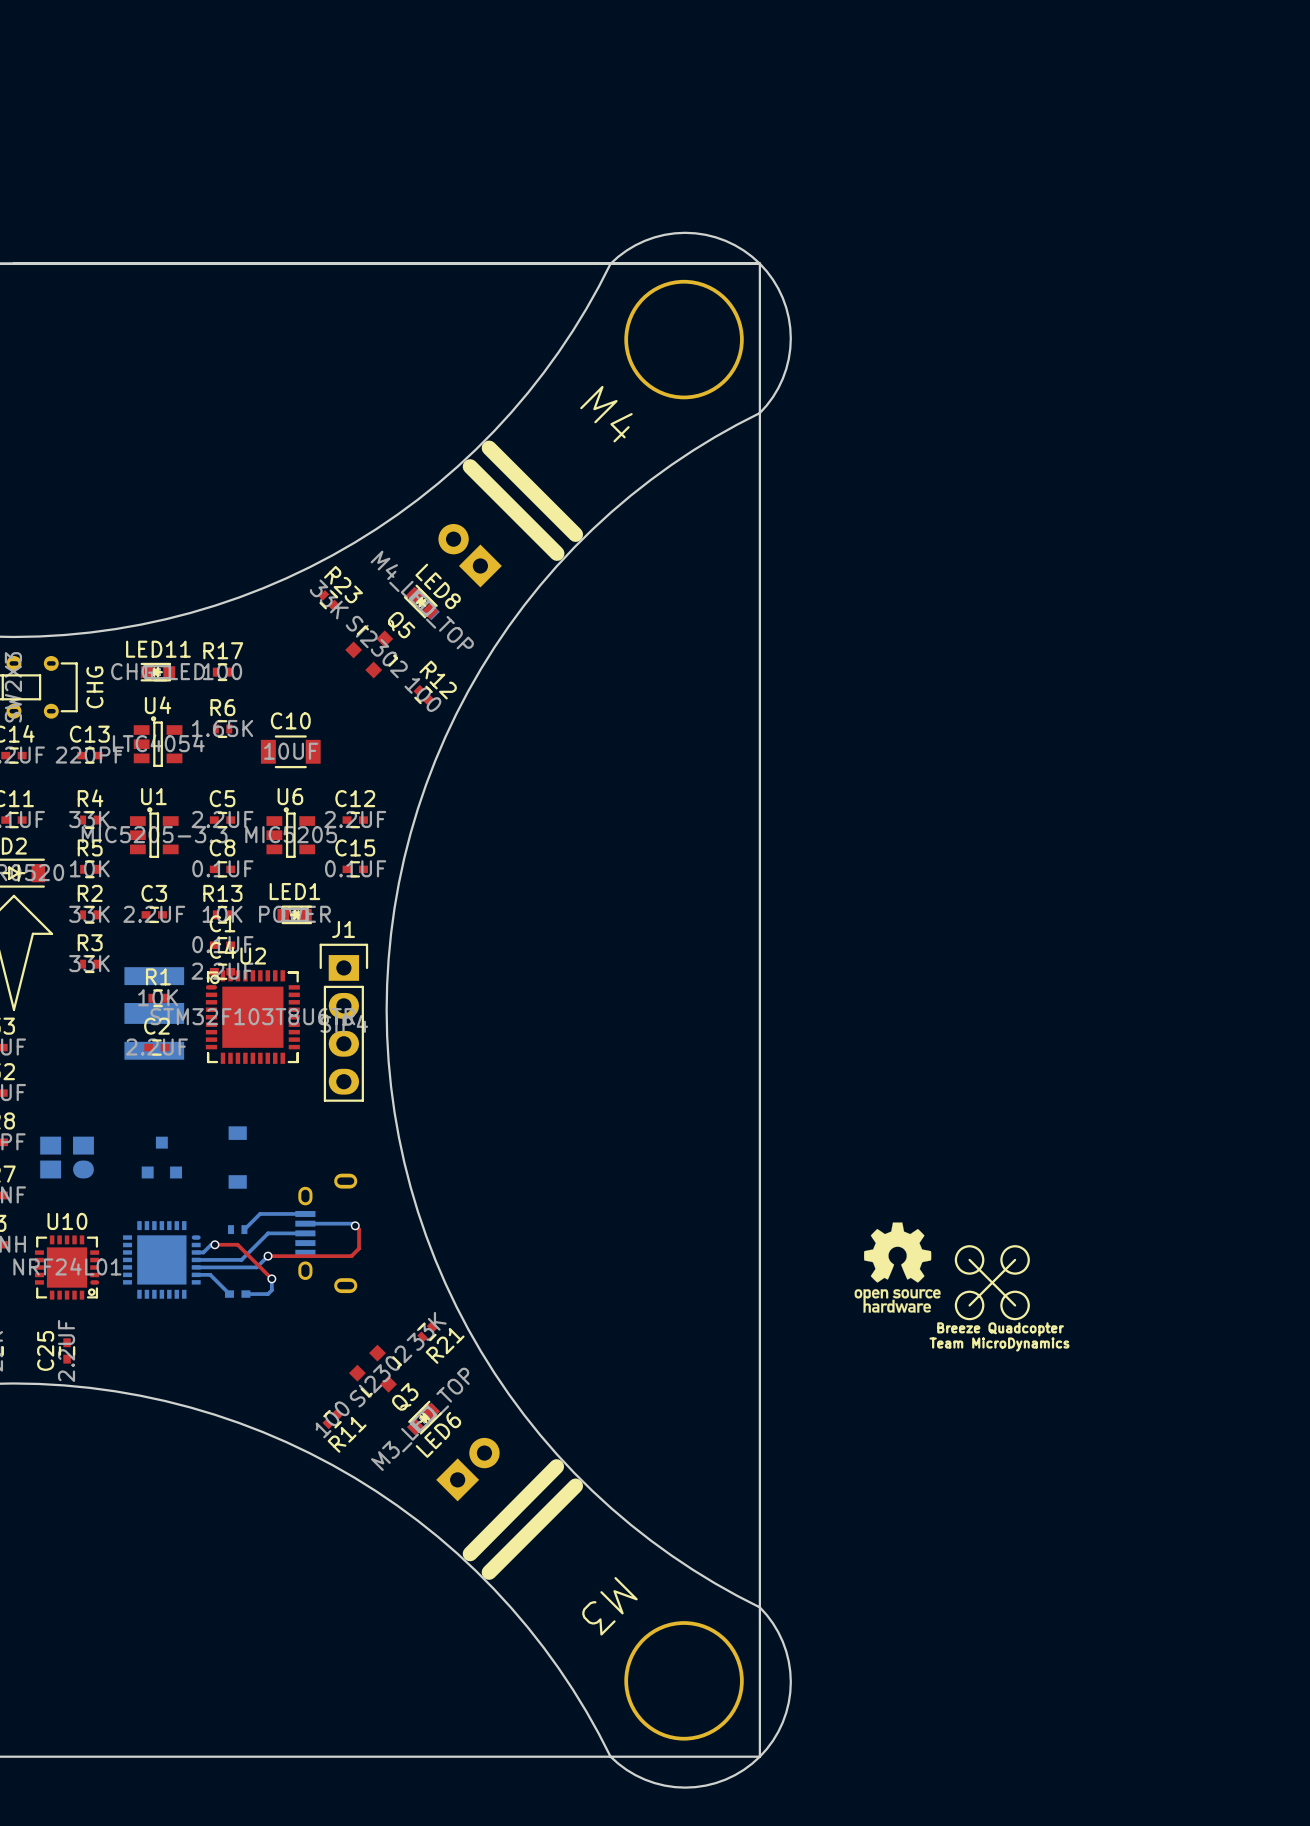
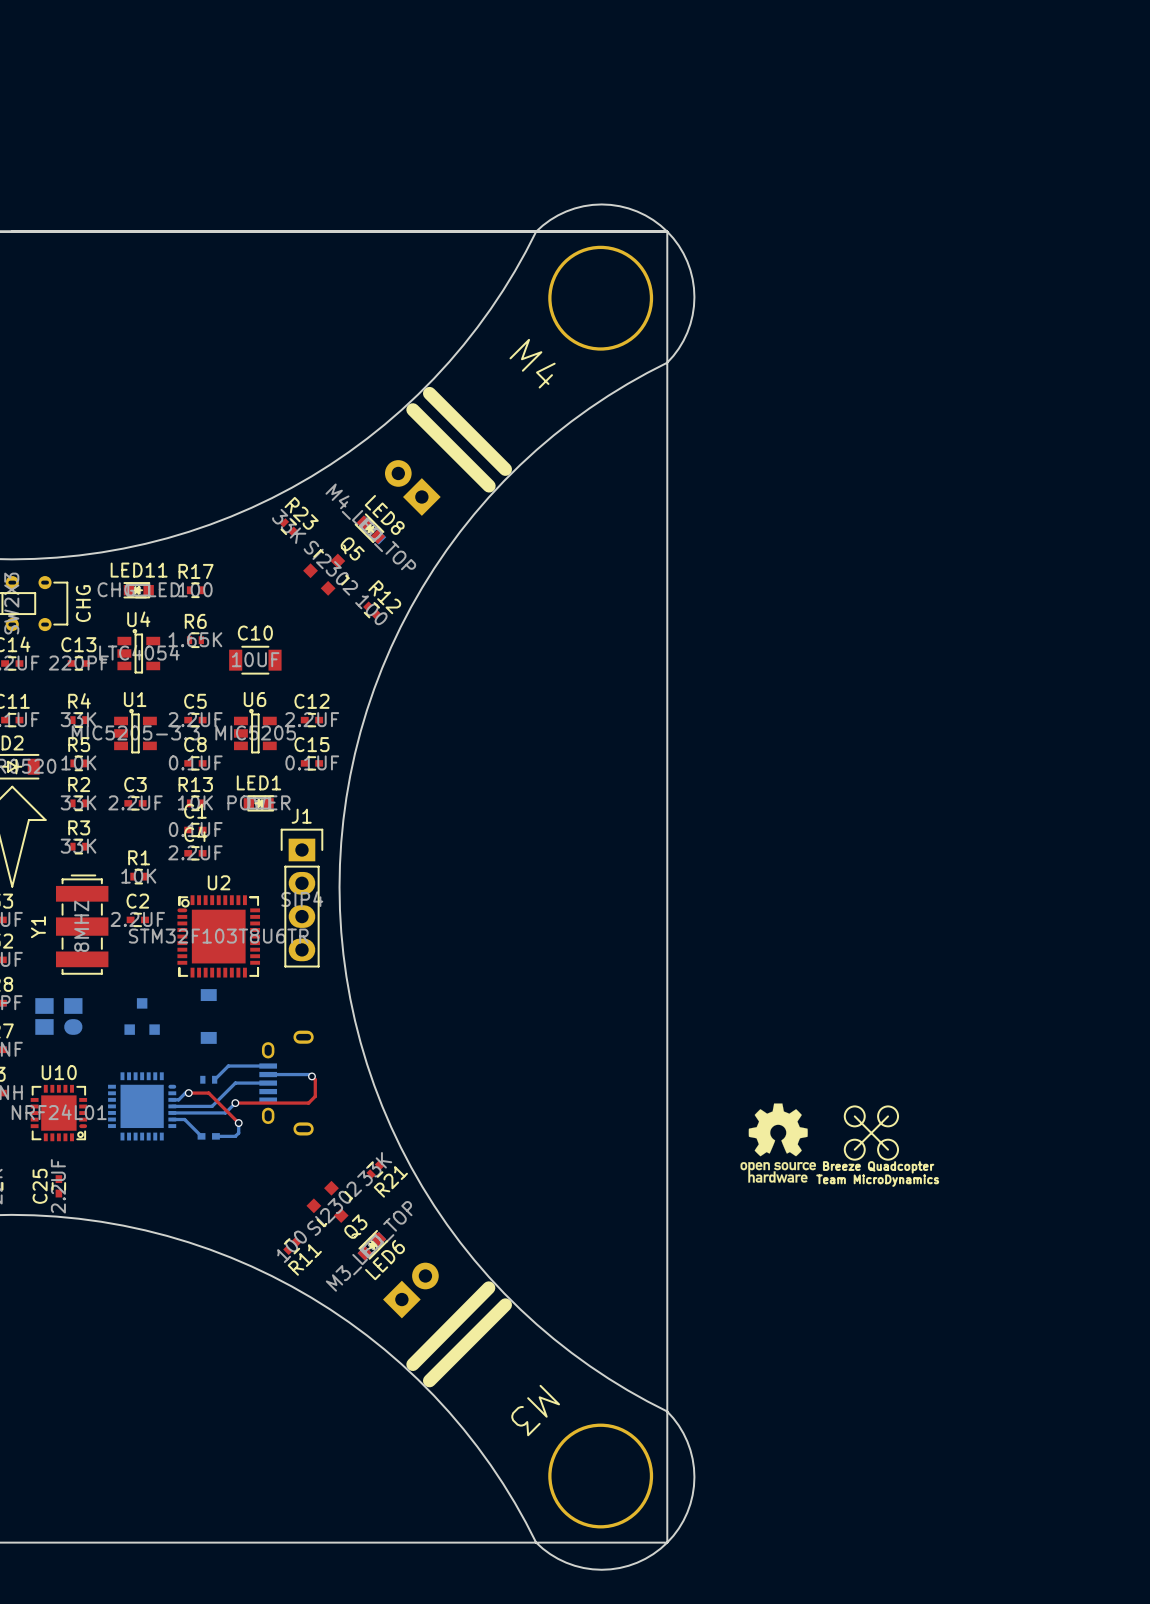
Y1 side: bottom (154, 1013) -> top (82, 924)
U2 position: (252, 1017) -> (218, 936)
drawing shape: [929, 1245, 1070, 1352] -> [816, 1105, 940, 1187]
drawing position: (897, 1267) -> (778, 1143)

